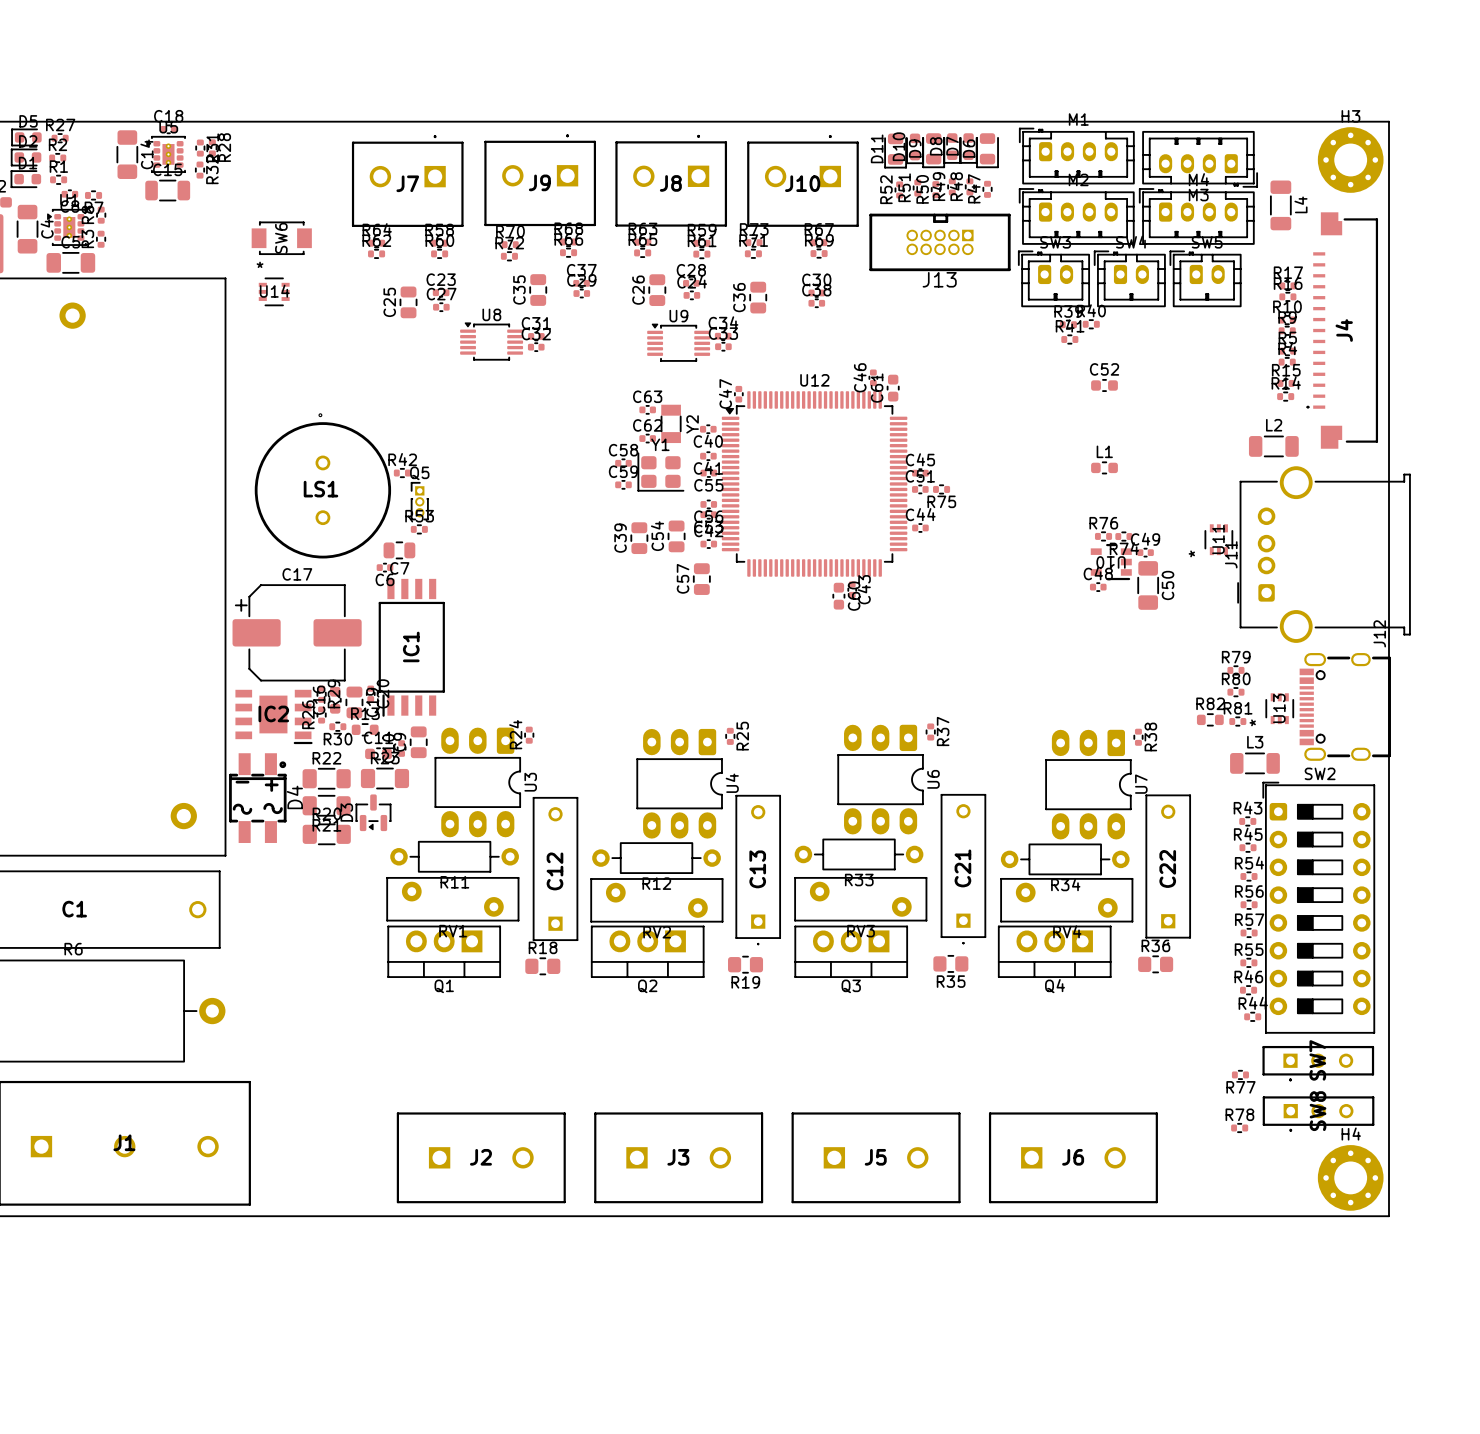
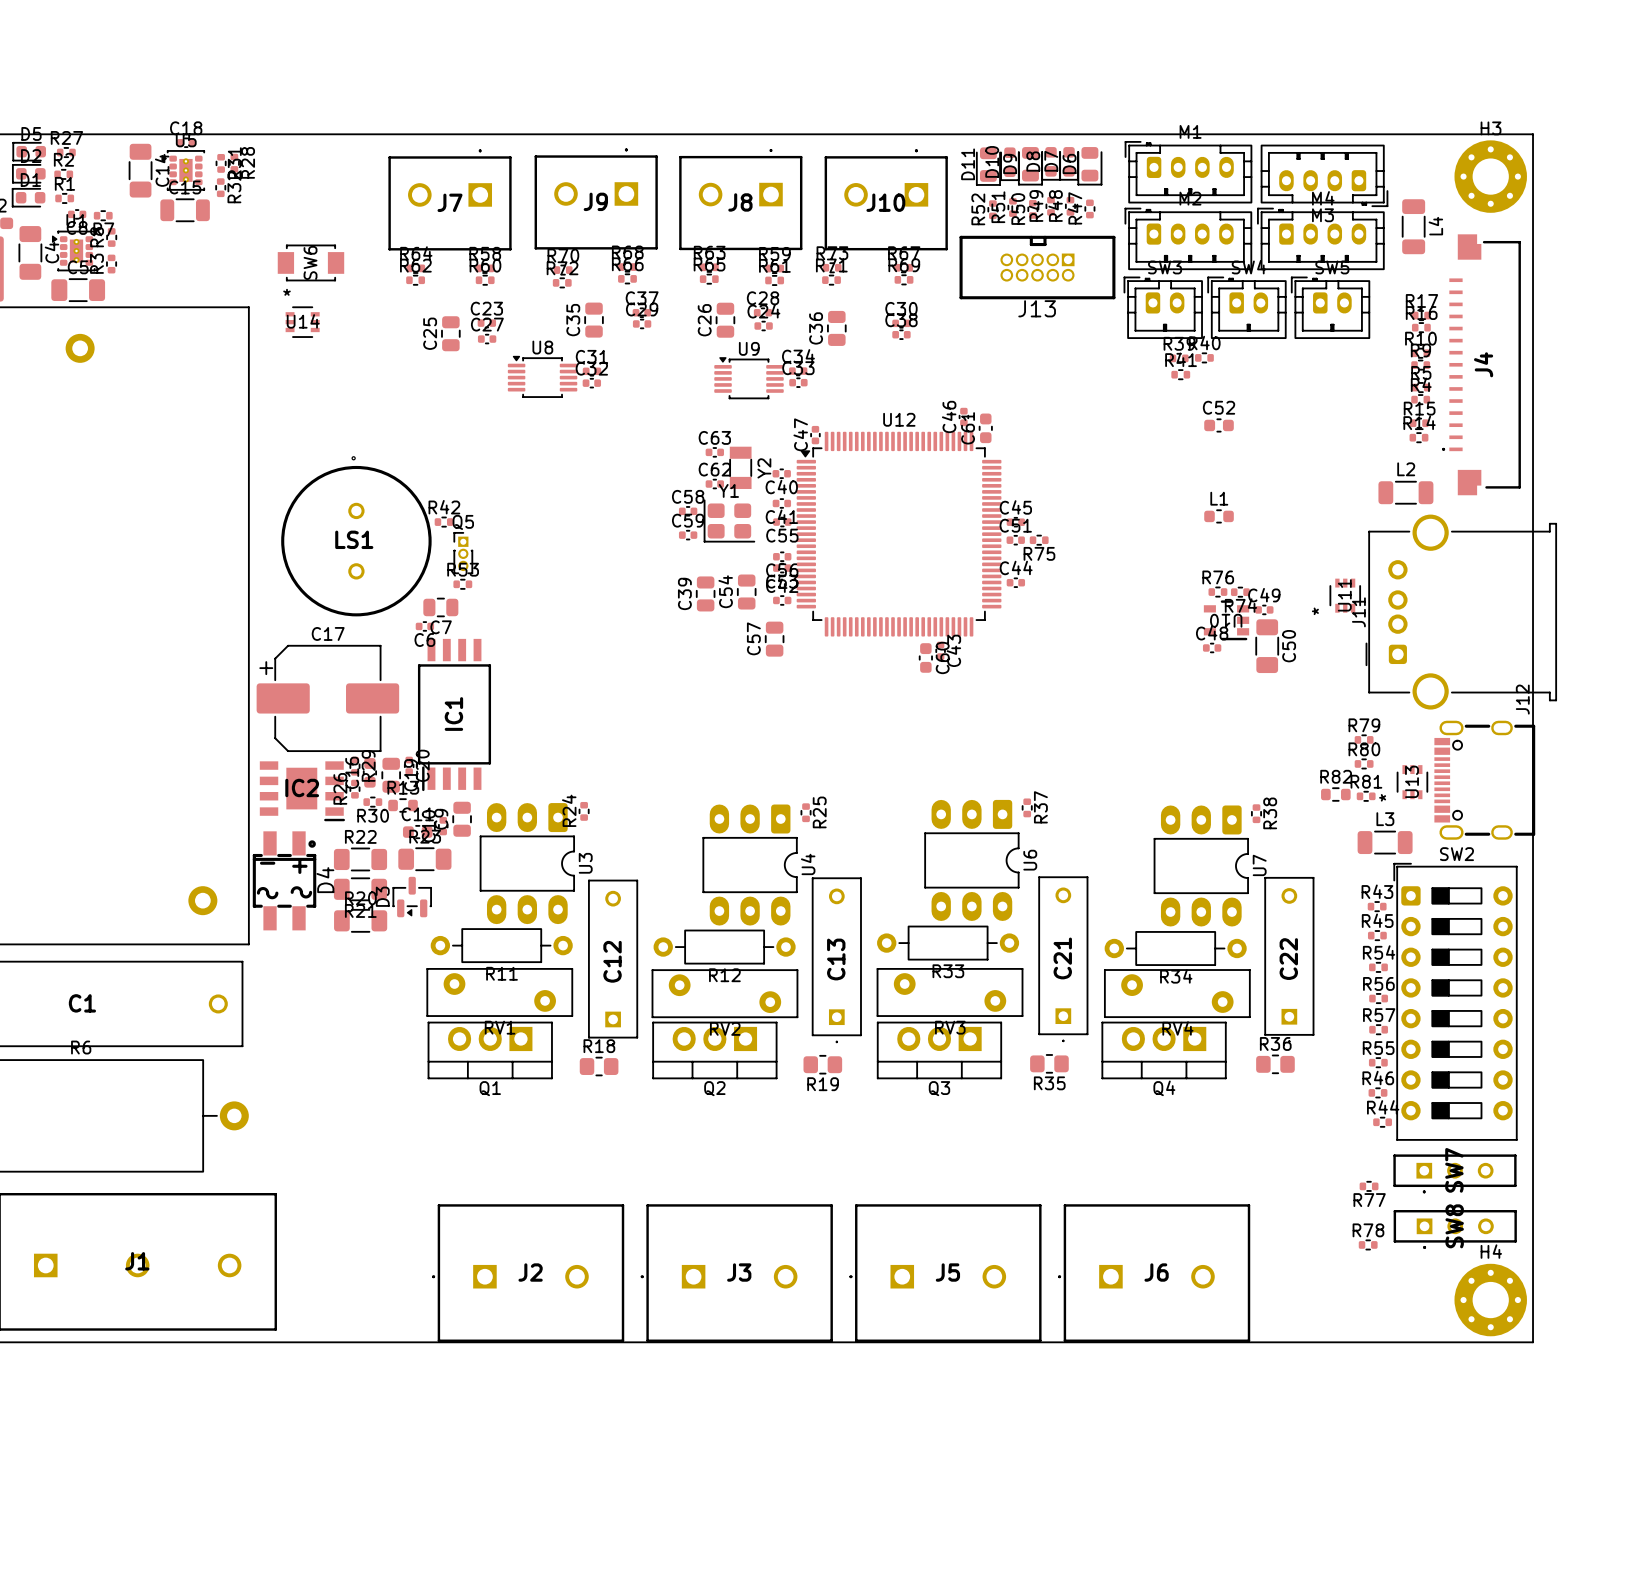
J2 footprint: [396, 1112, 566, 1204] -> [432, 1204, 625, 1342]
J3 footprint: [594, 1112, 764, 1204] -> [641, 1204, 833, 1342]
J5 footprint: [791, 1112, 961, 1204] -> [849, 1204, 1042, 1342]
J6 footprint: [988, 1112, 1158, 1204] -> [1058, 1204, 1251, 1342]

